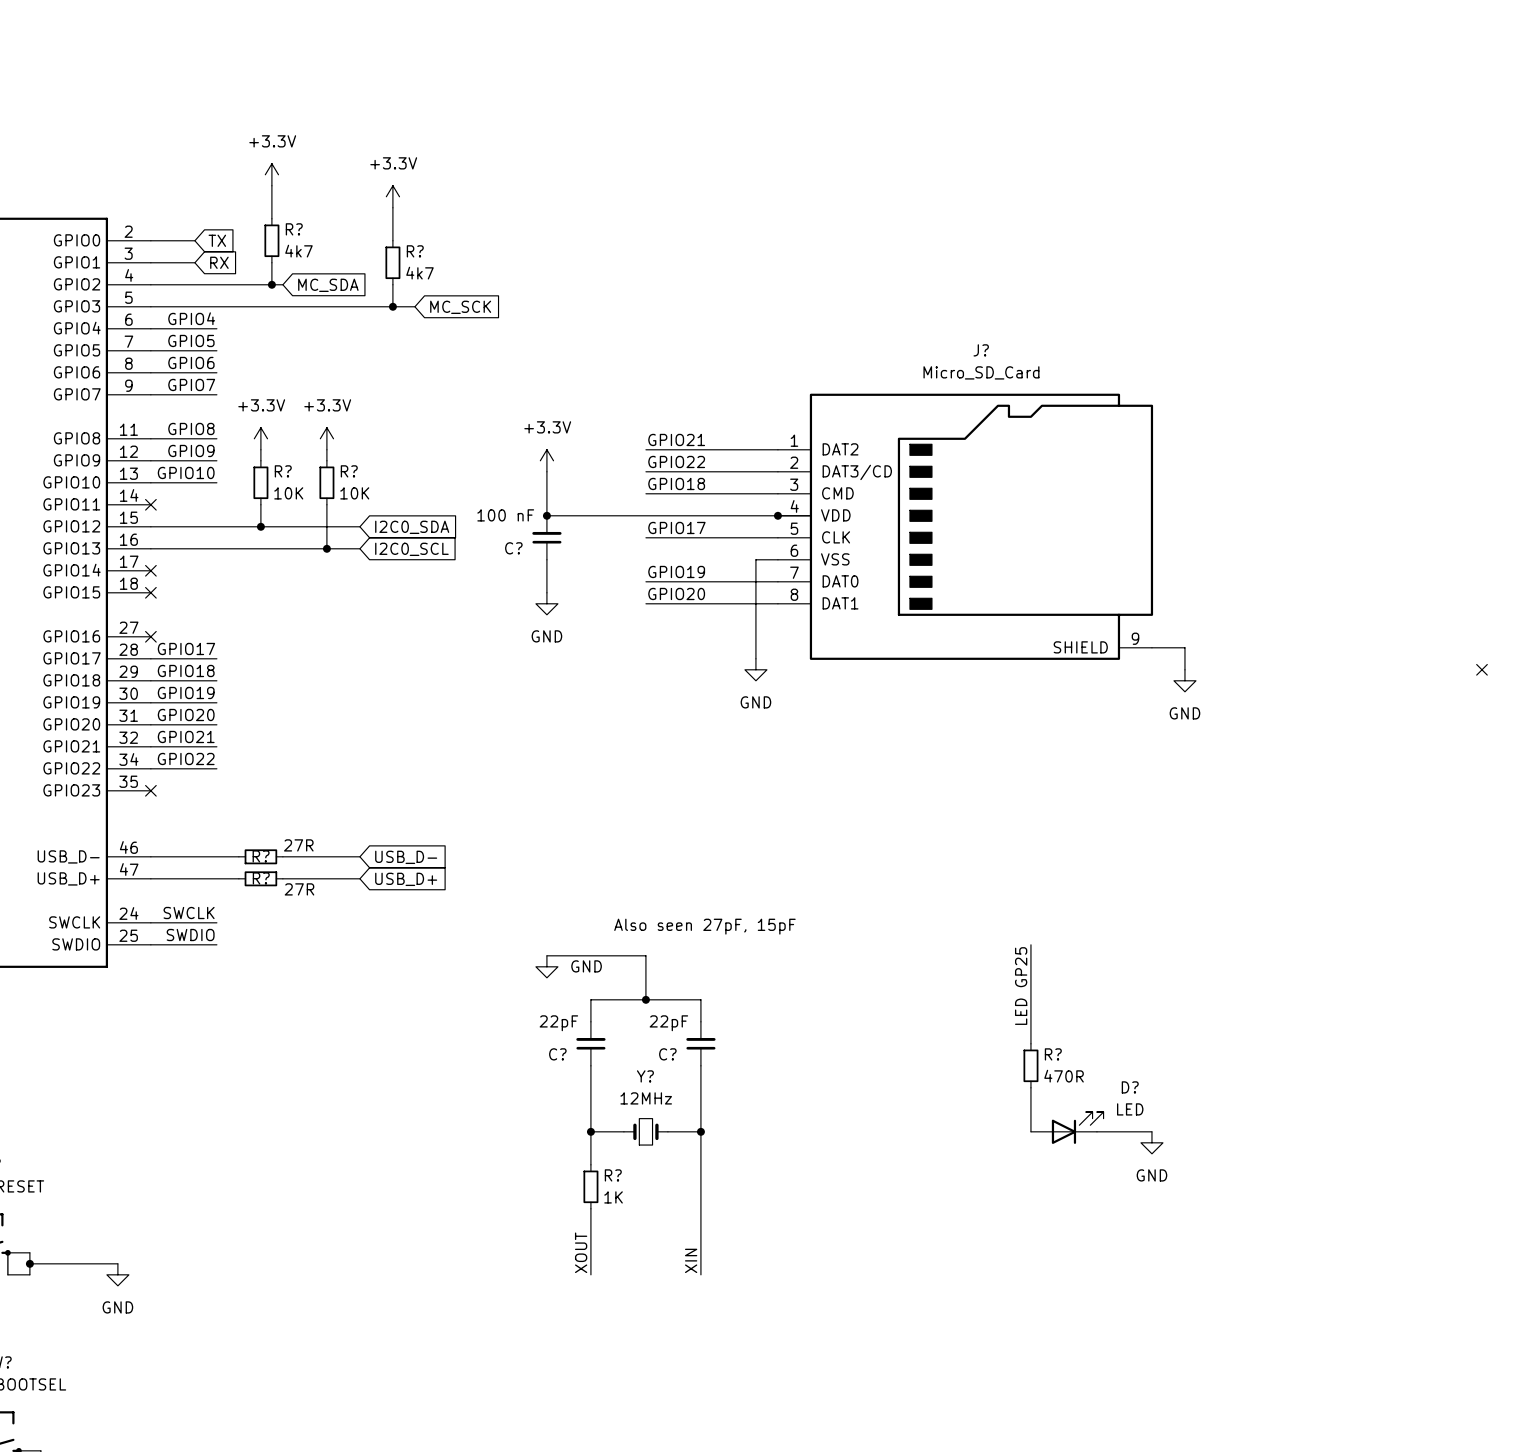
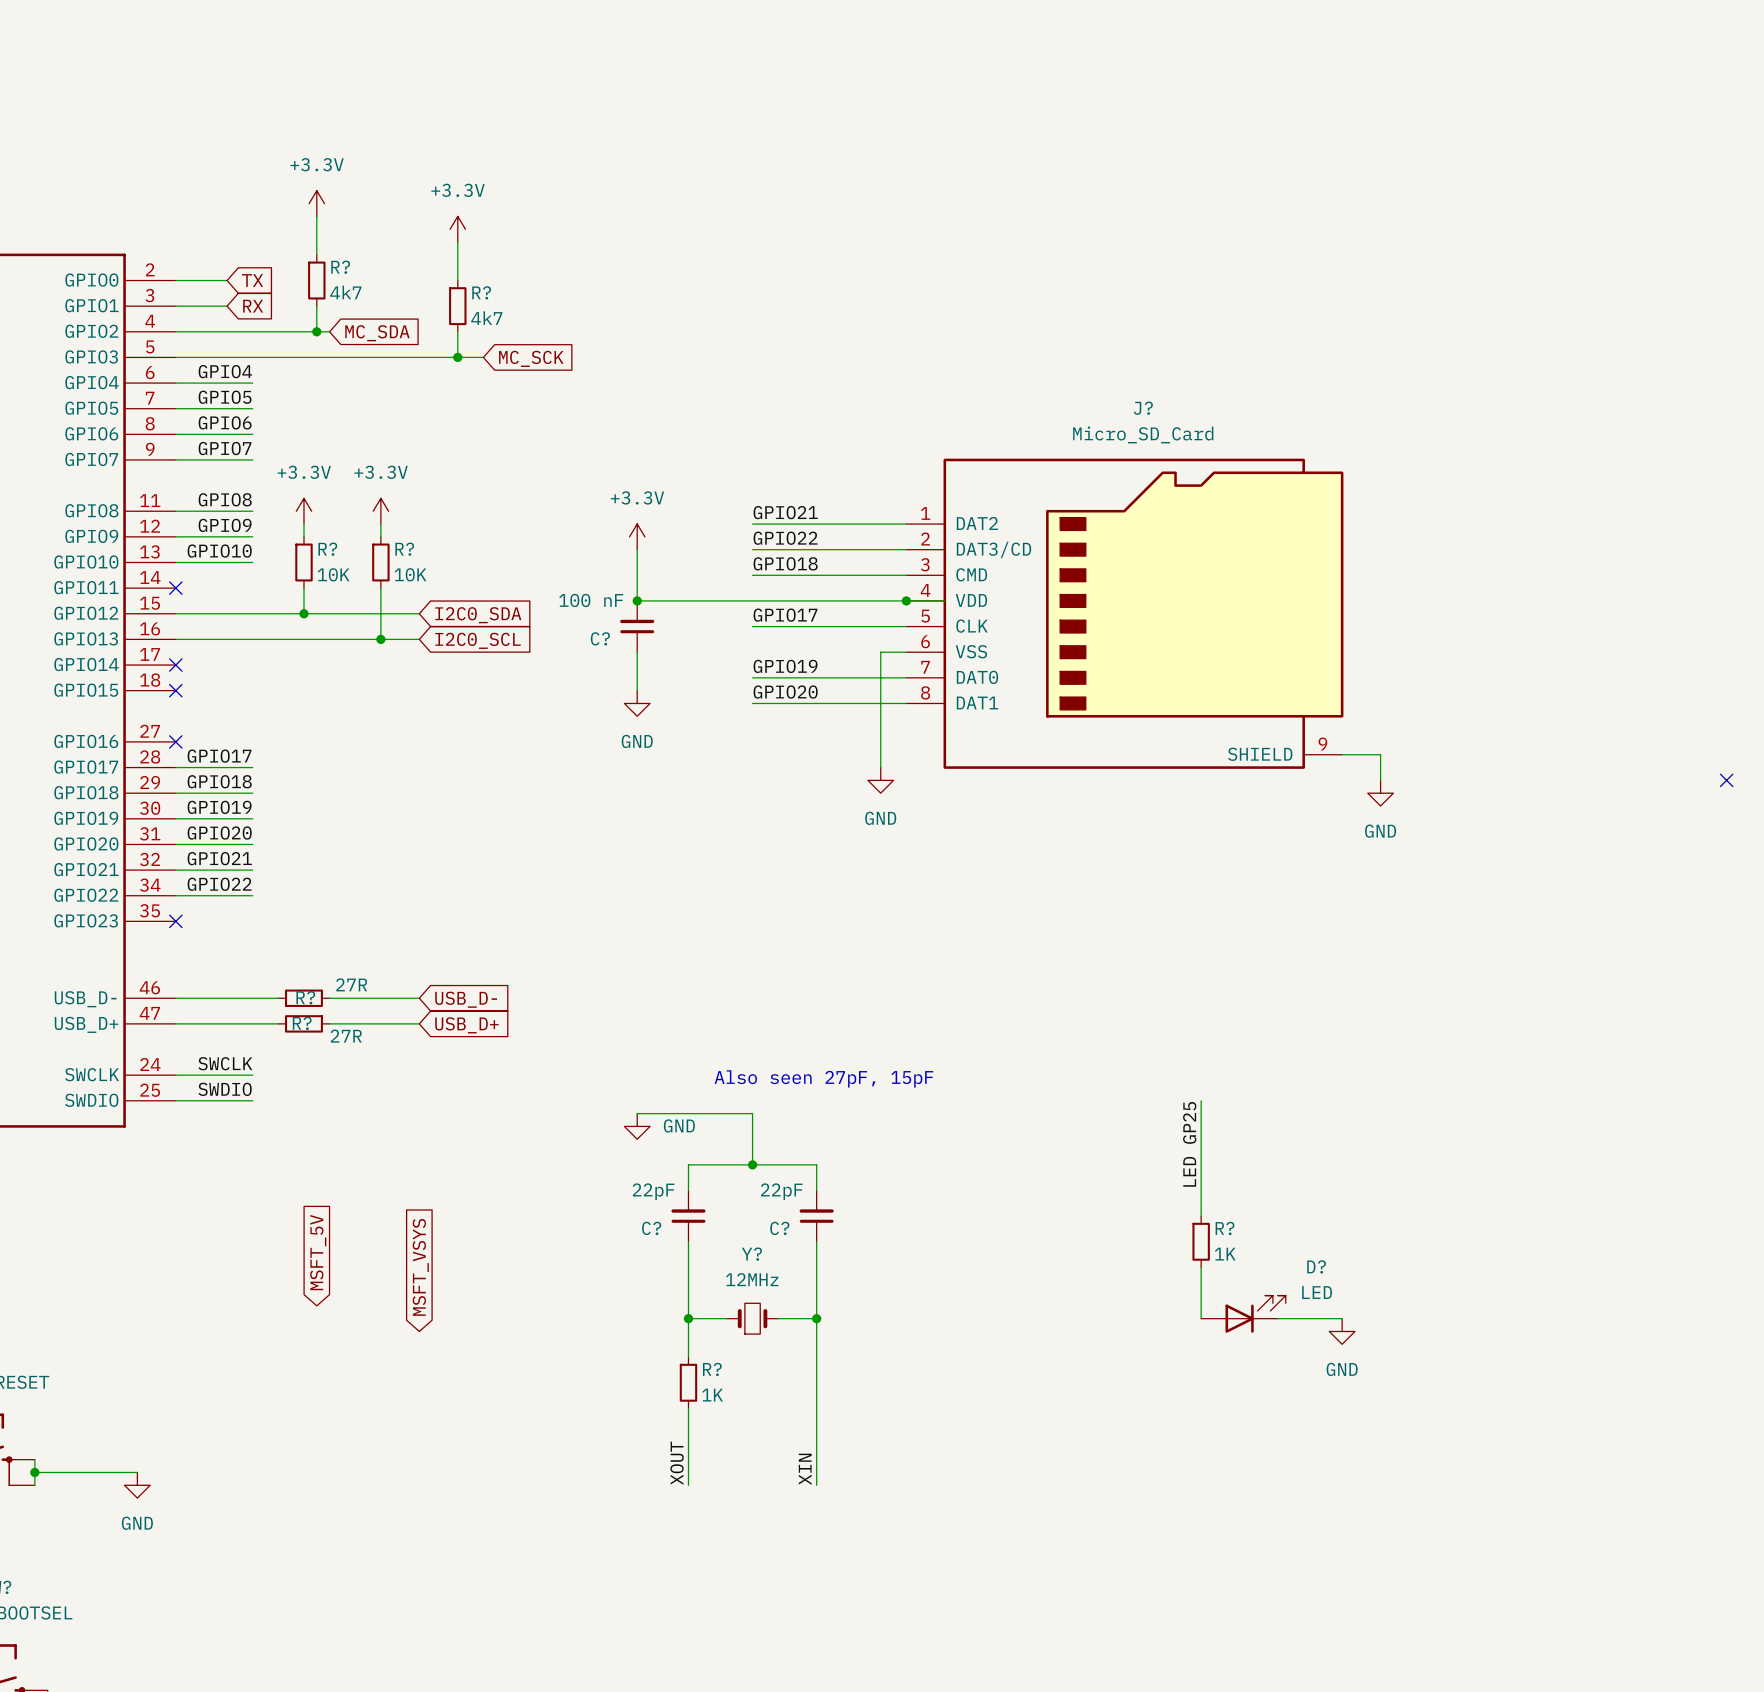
global label: none -> MSFT_5V (318, 1252)
R? value: 470R (1064, 1076) -> 1K (1225, 1254)
global label: none -> MSFT_VSYS (420, 1267)

